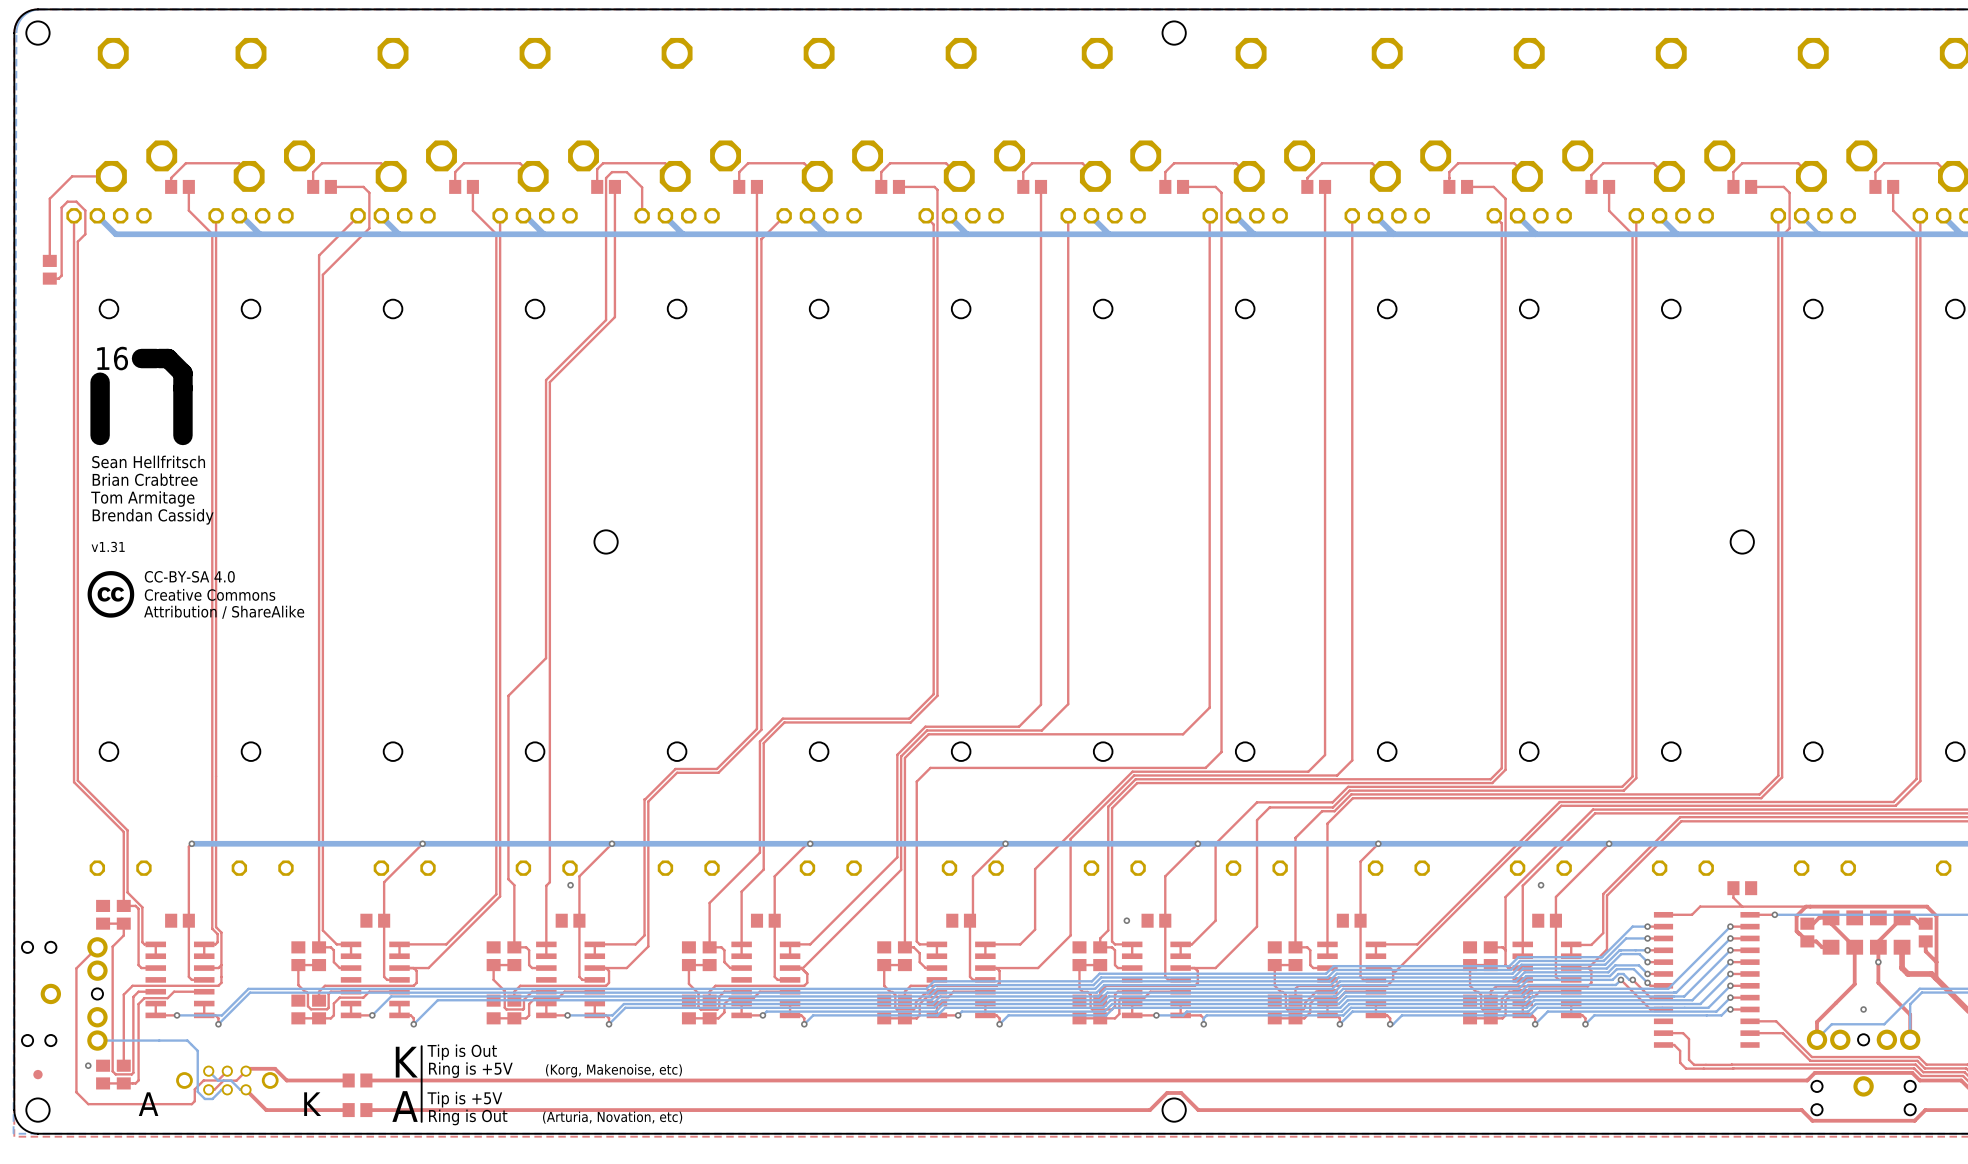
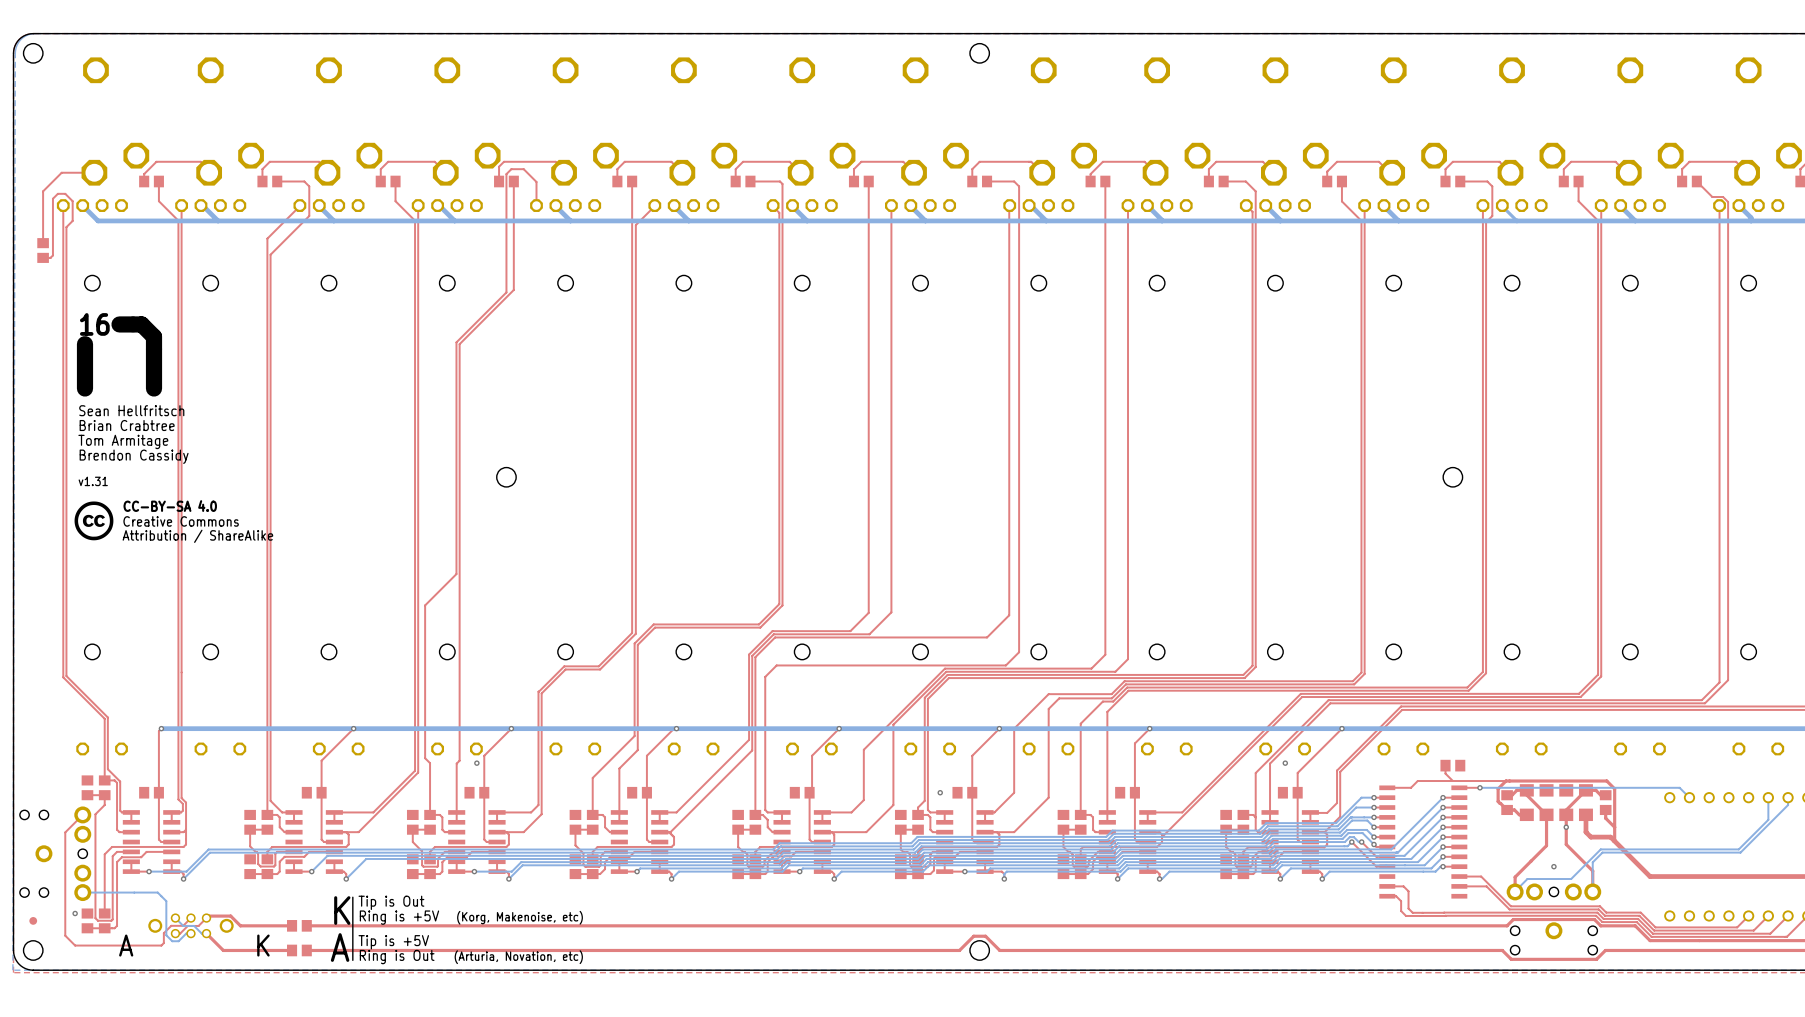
text: Brendan Cassidy (153, 516) -> Brendon Cassidy (134, 456)

